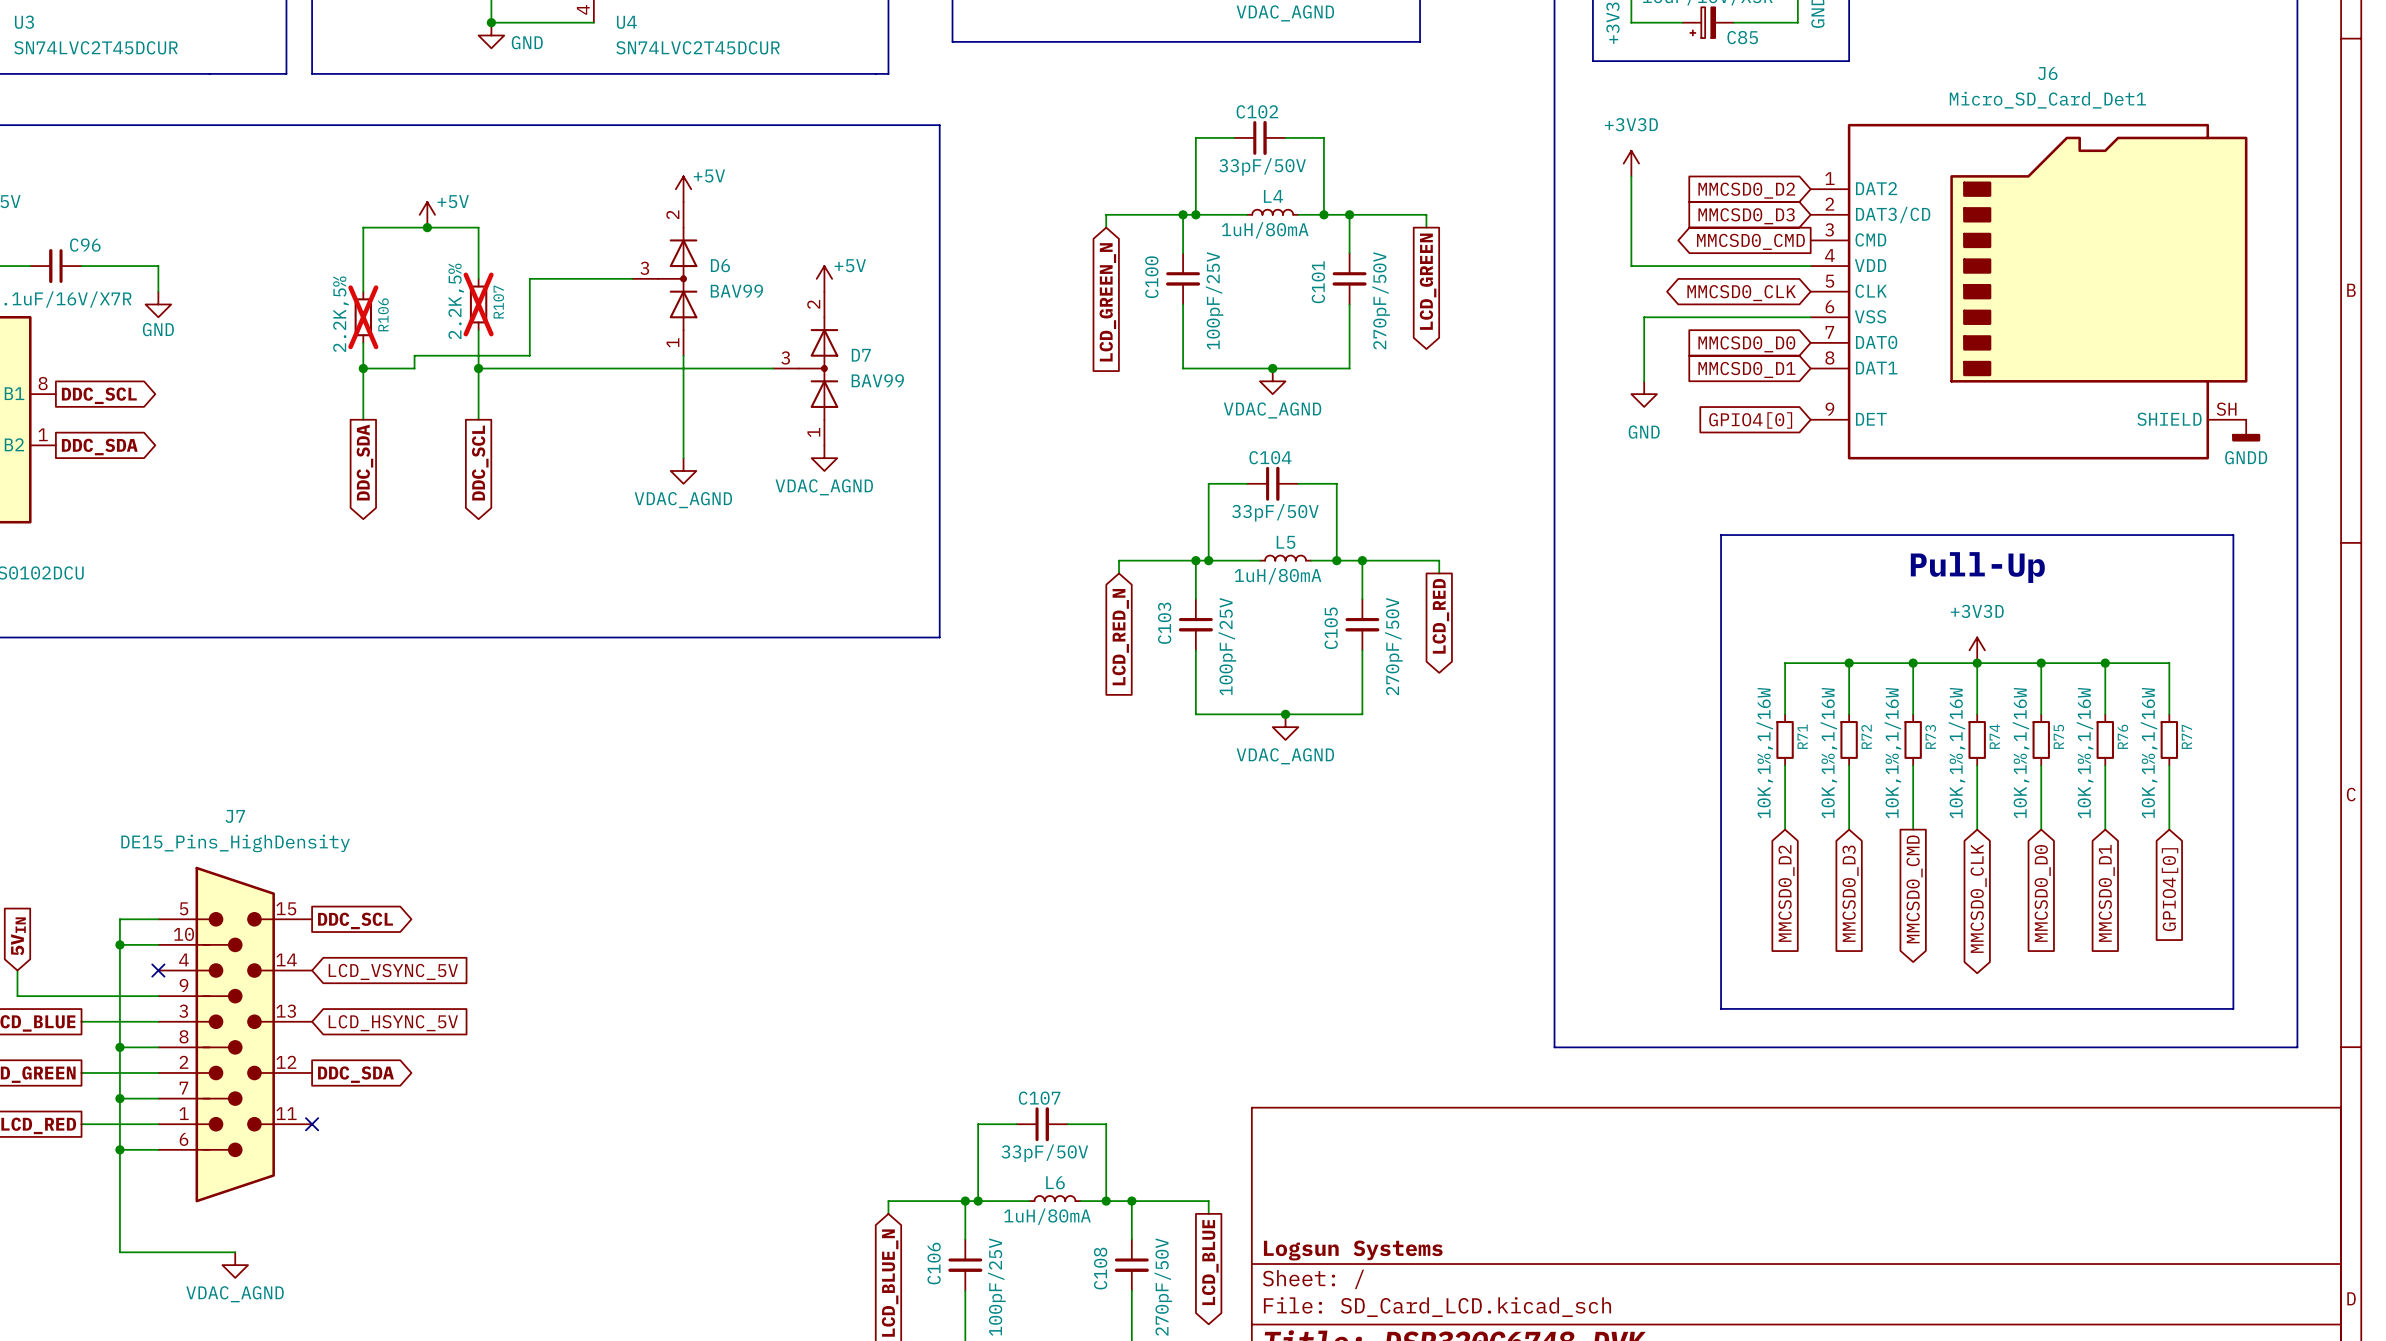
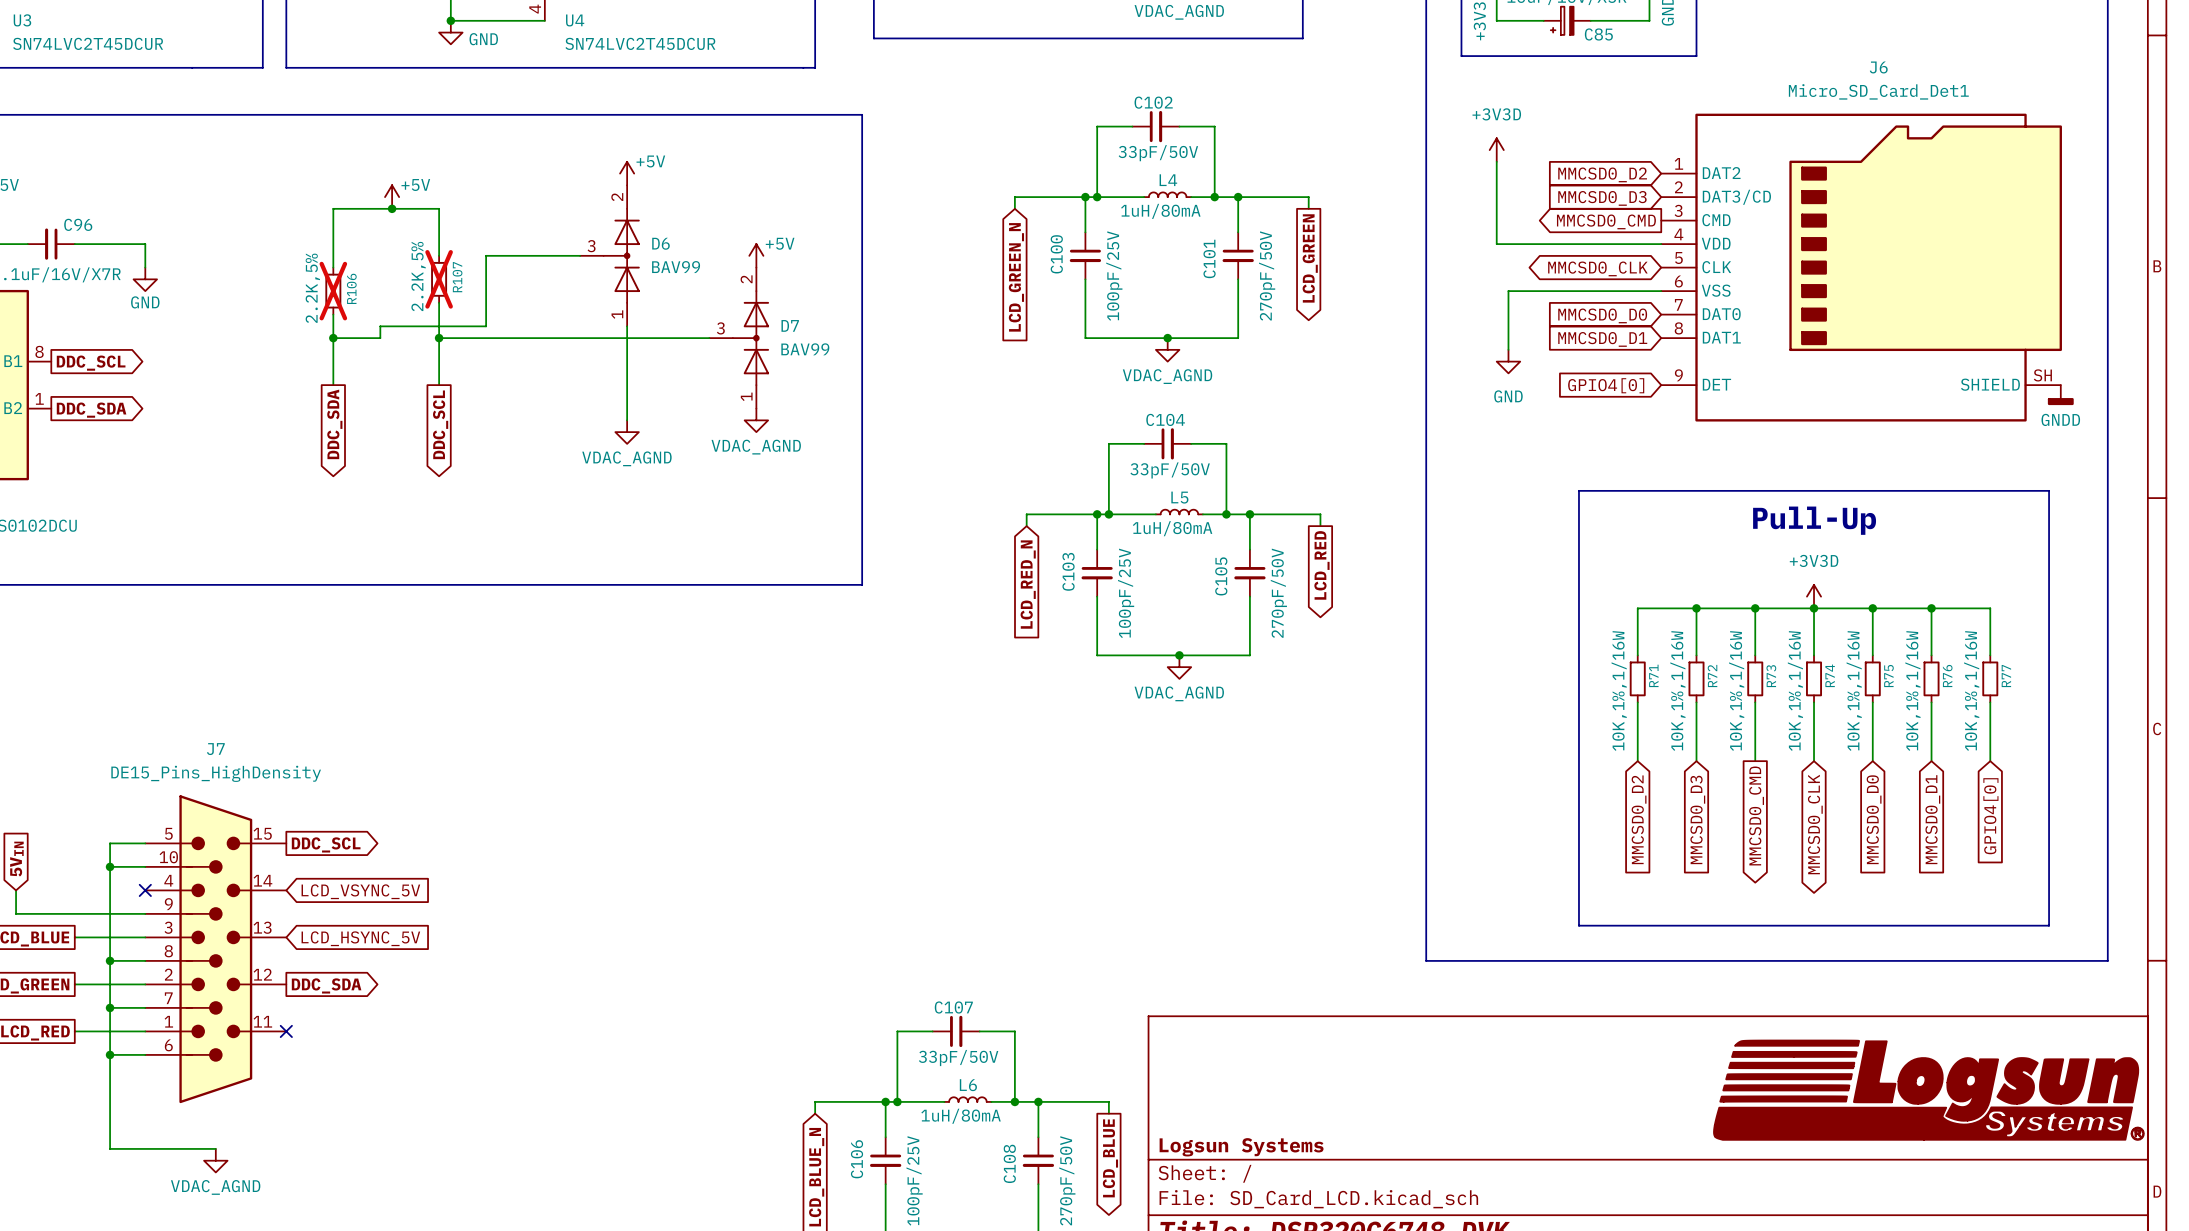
power symbol: none -> (1928, 1090)

